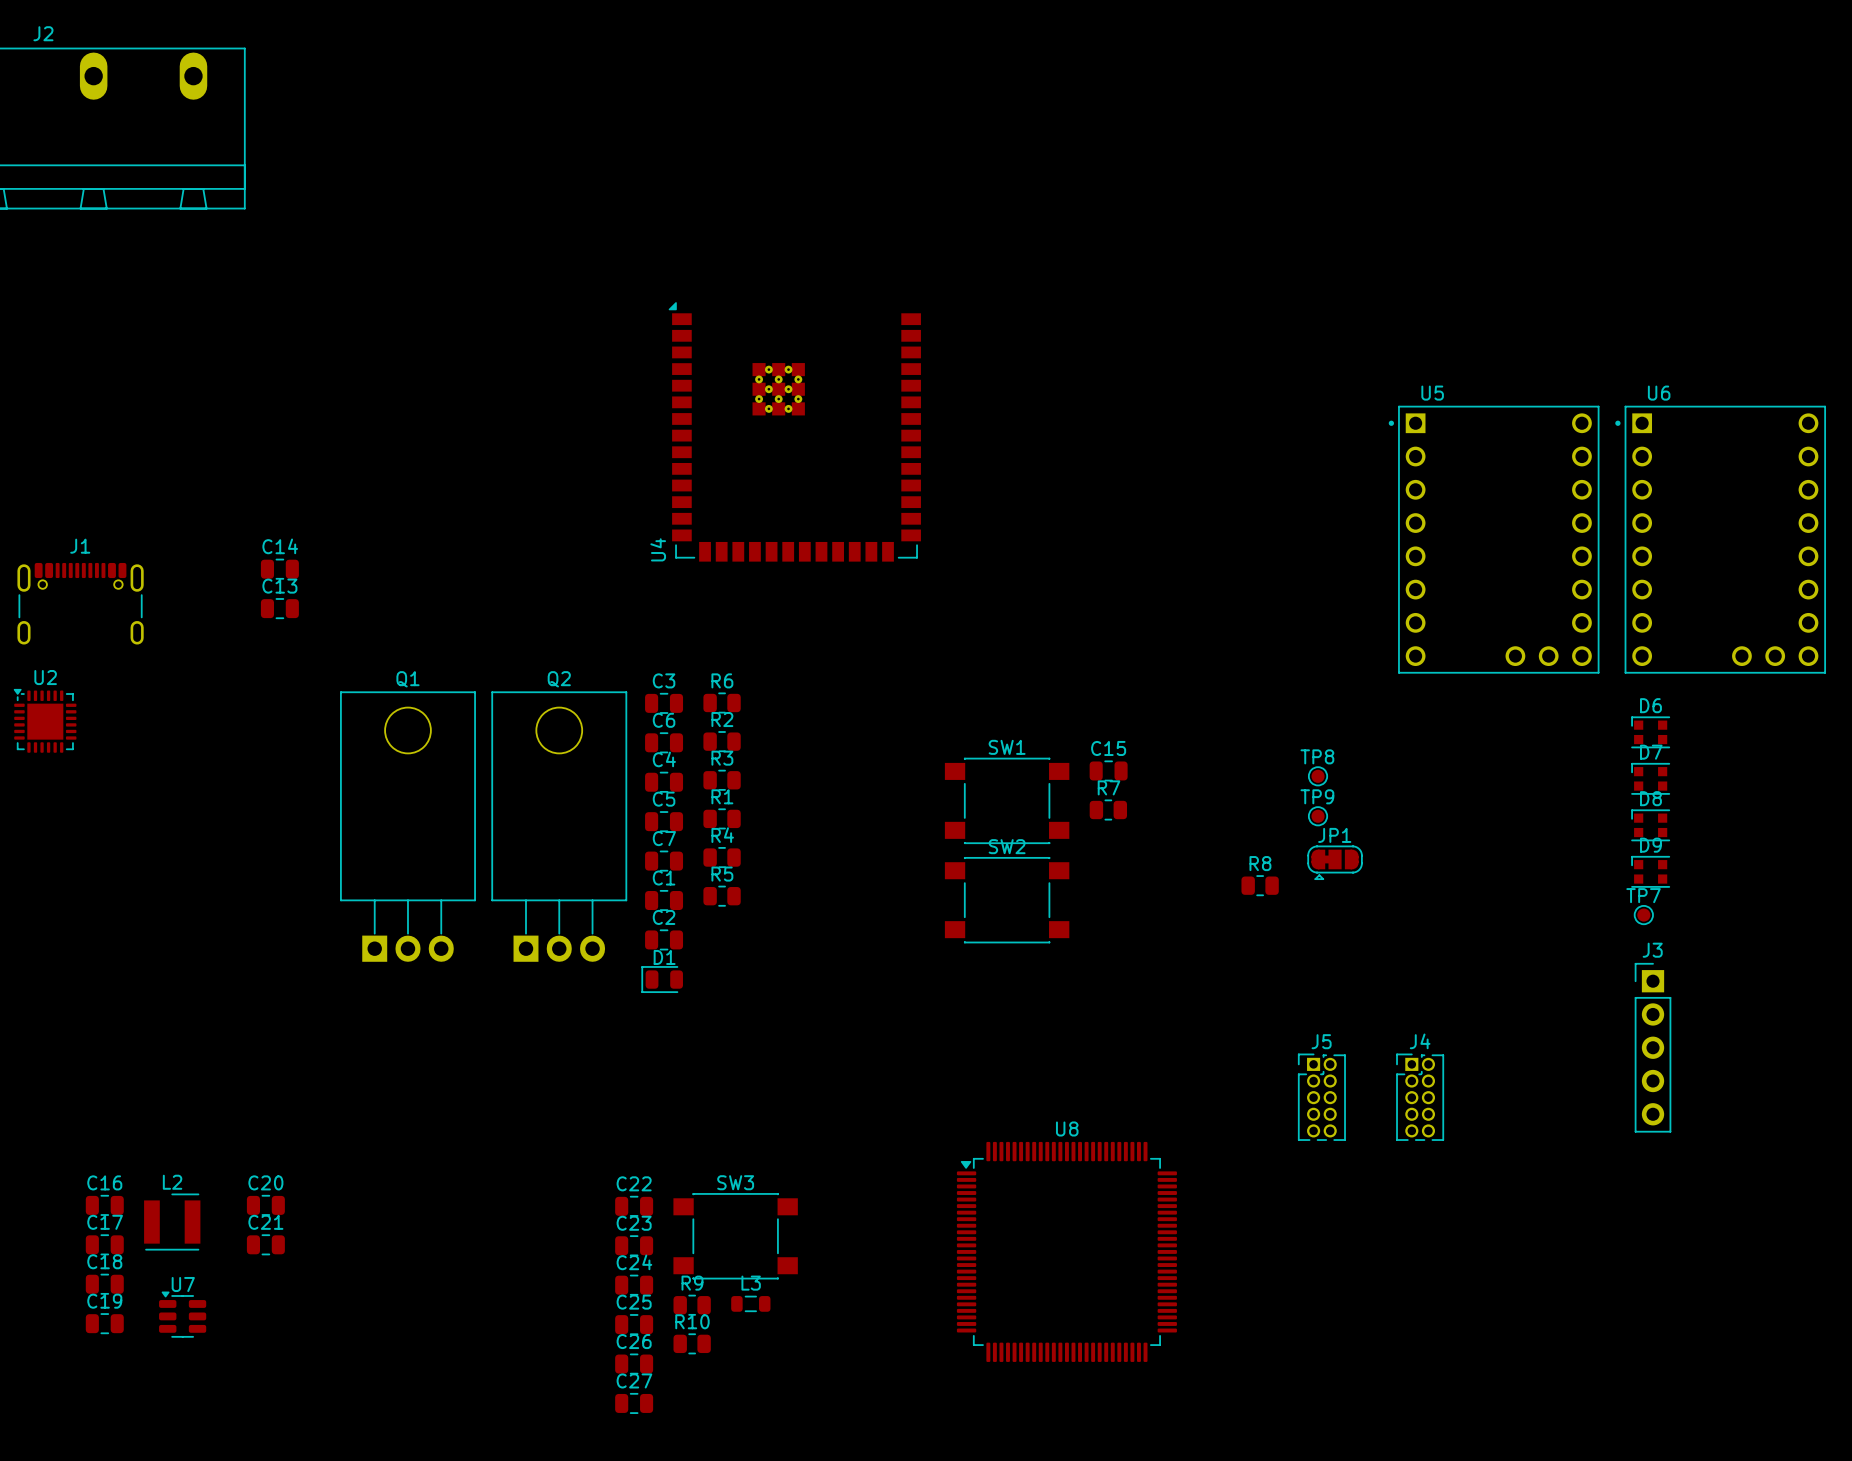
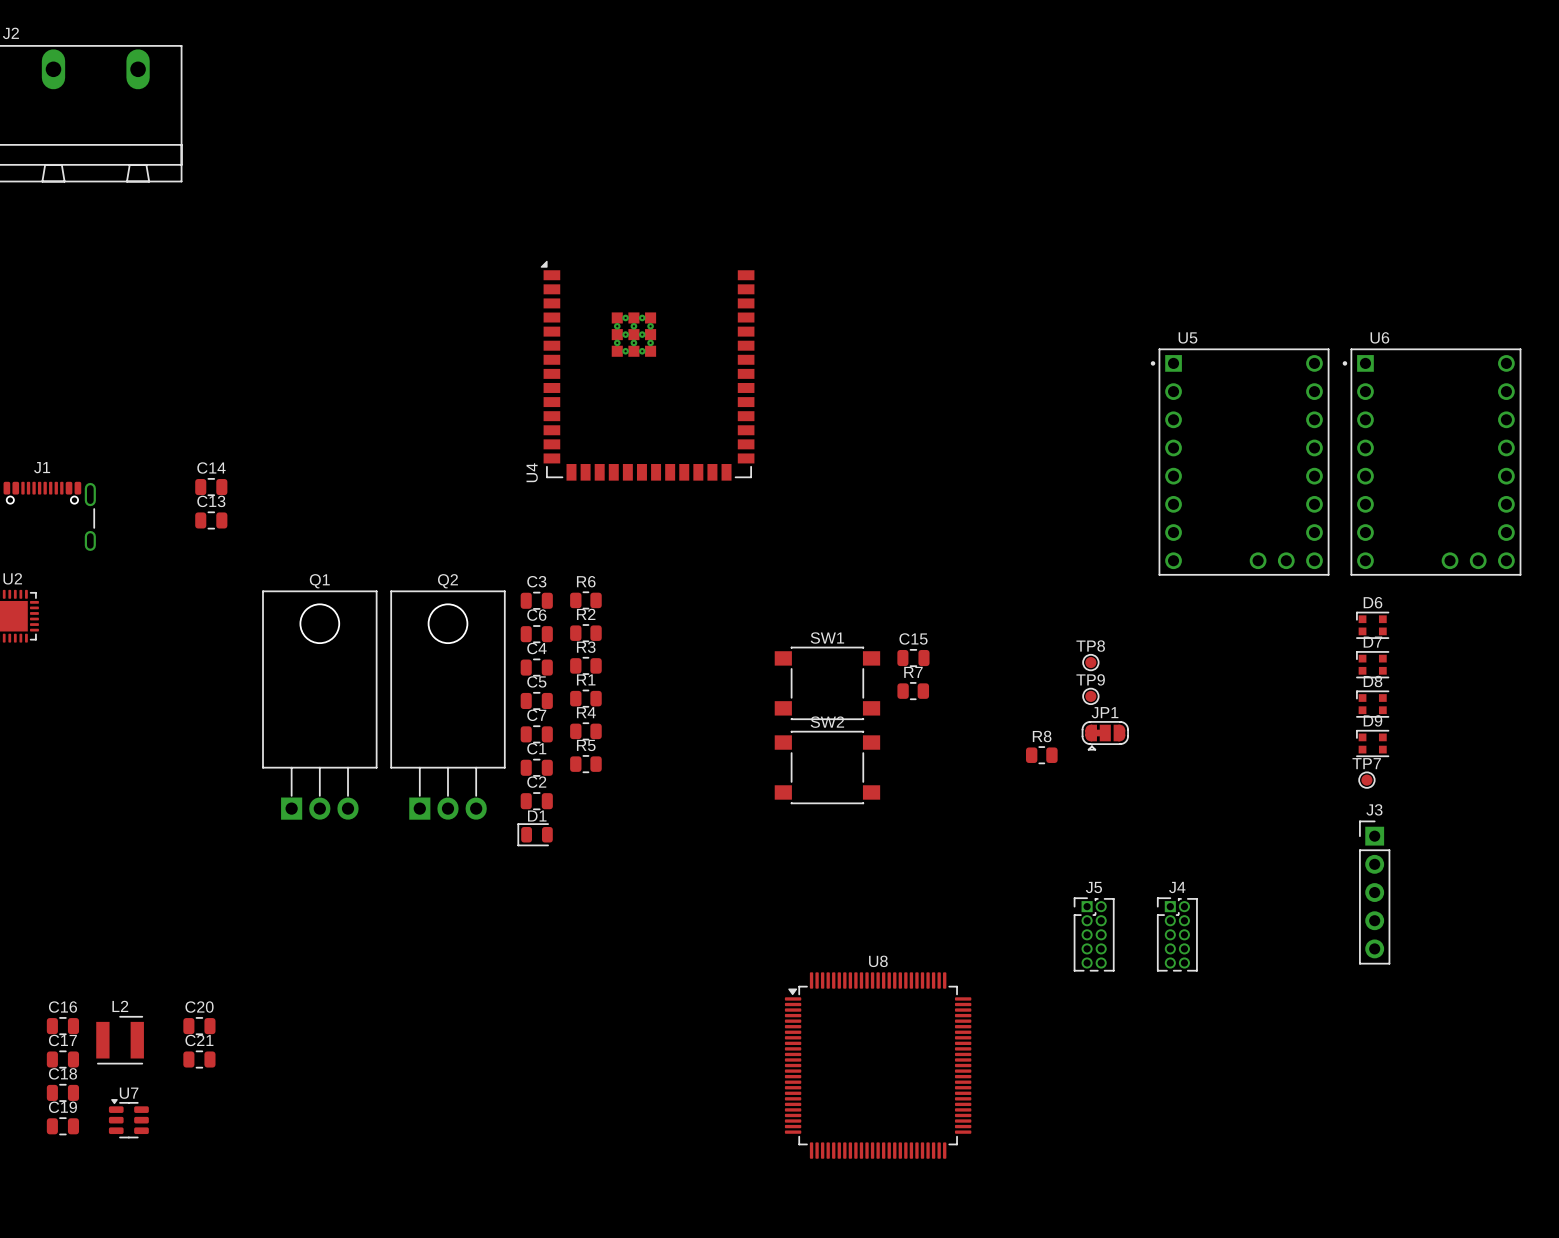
C22: (634, 1206) -> none
SW3: (735, 1236) -> none
C23: (634, 1245) -> none
C24: (634, 1285) -> none
L3: (750, 1303) -> none
R9: (692, 1305) -> none
C25: (634, 1324) -> none
R10: (692, 1343) -> none
C26: (634, 1364) -> none
C27: (634, 1403) -> none

